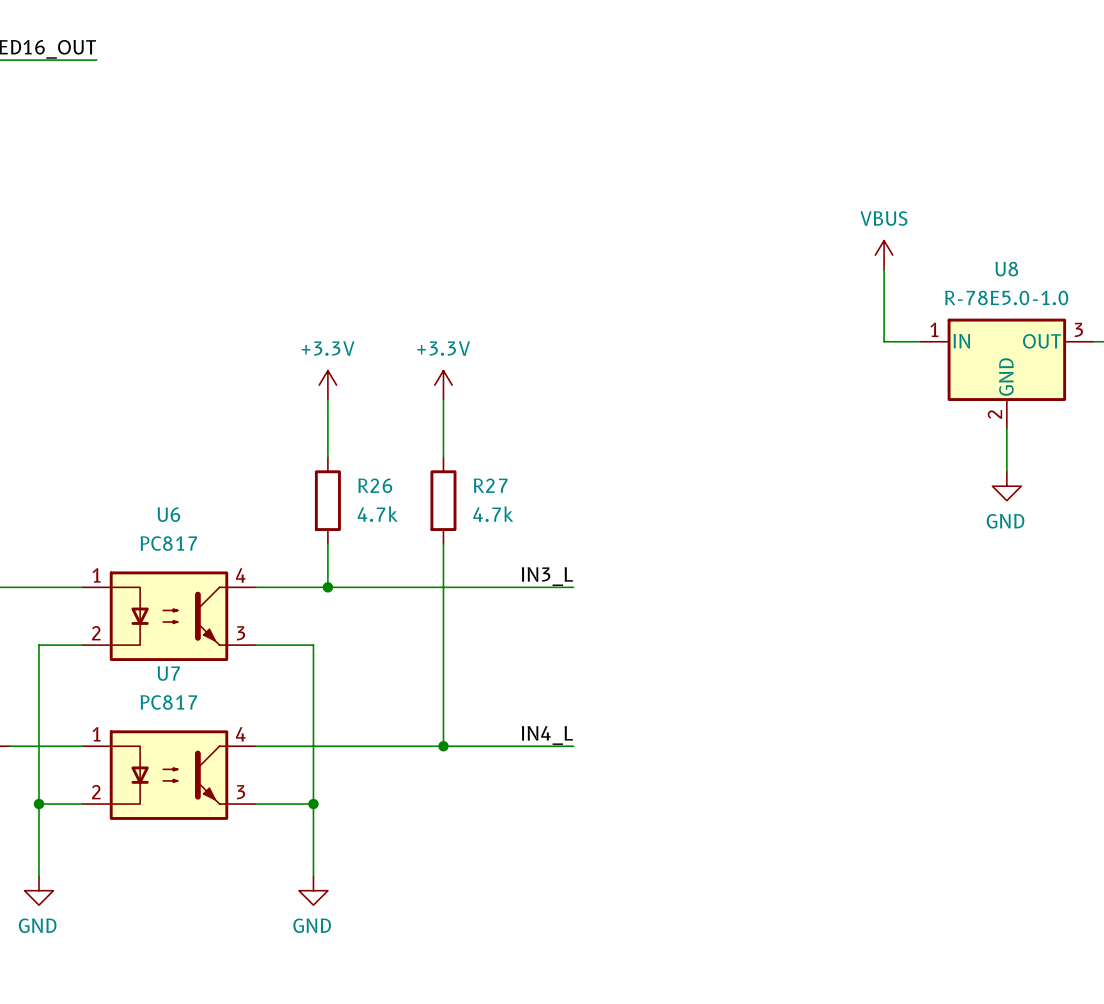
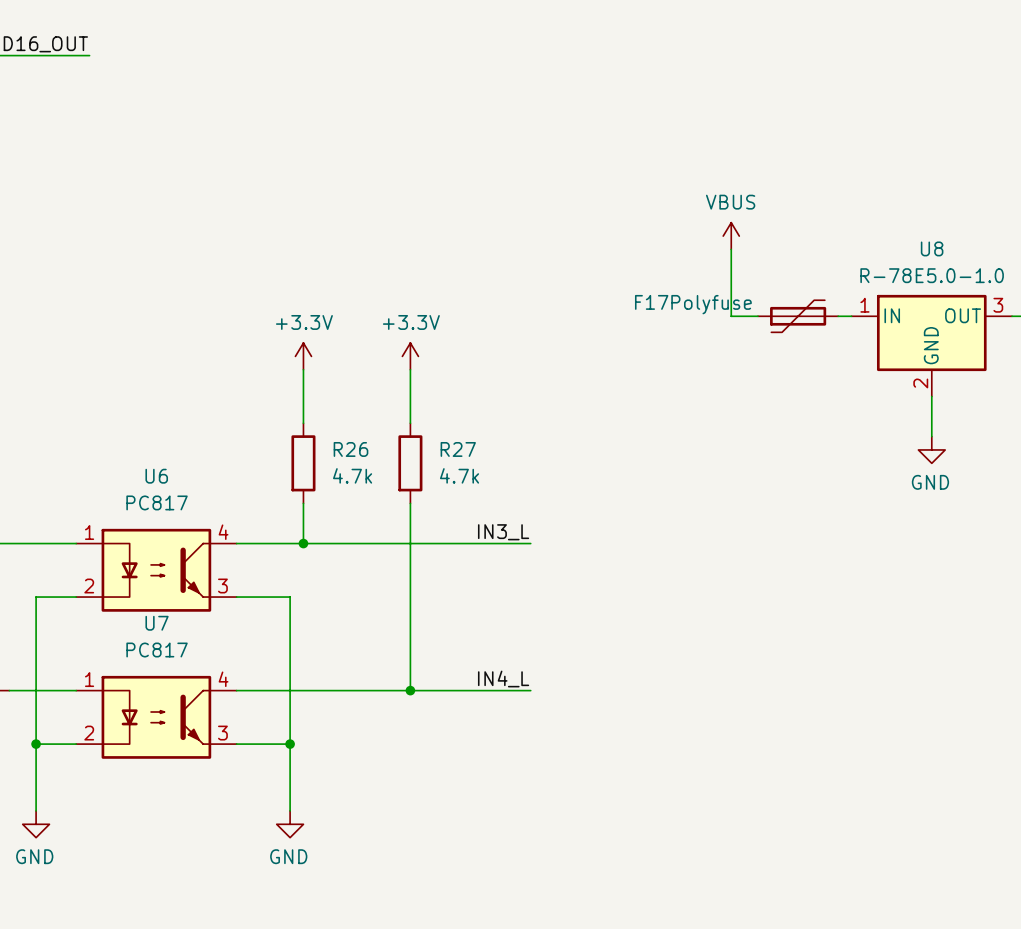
power symbol position: VBUS (884, 255) -> VBUS (731, 236)
wire: none -> (731, 249) (731, 316) (758, 316)
wire: (884, 269) (884, 341) (905, 341) -> none
F17: none -> Polyfuse (798, 316)

